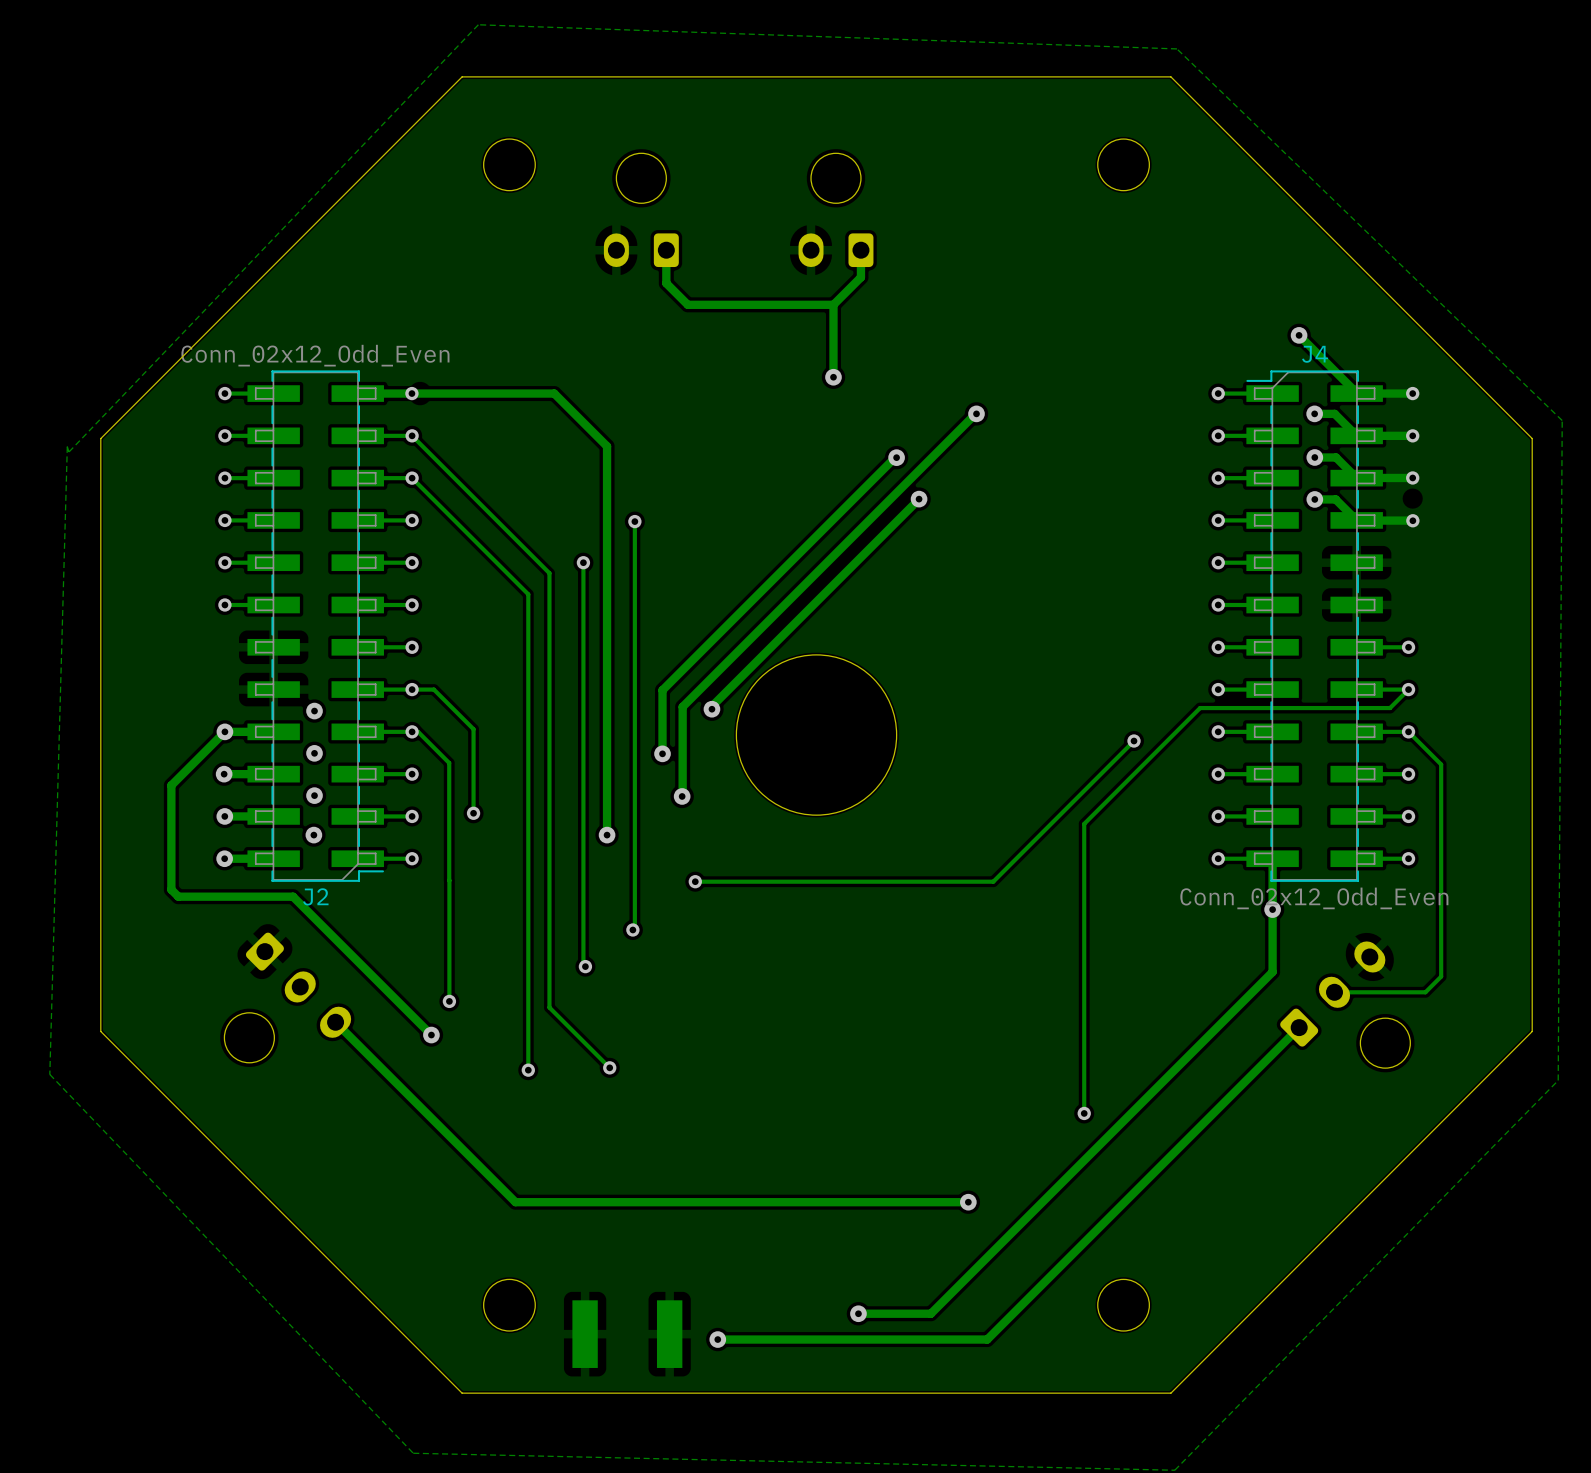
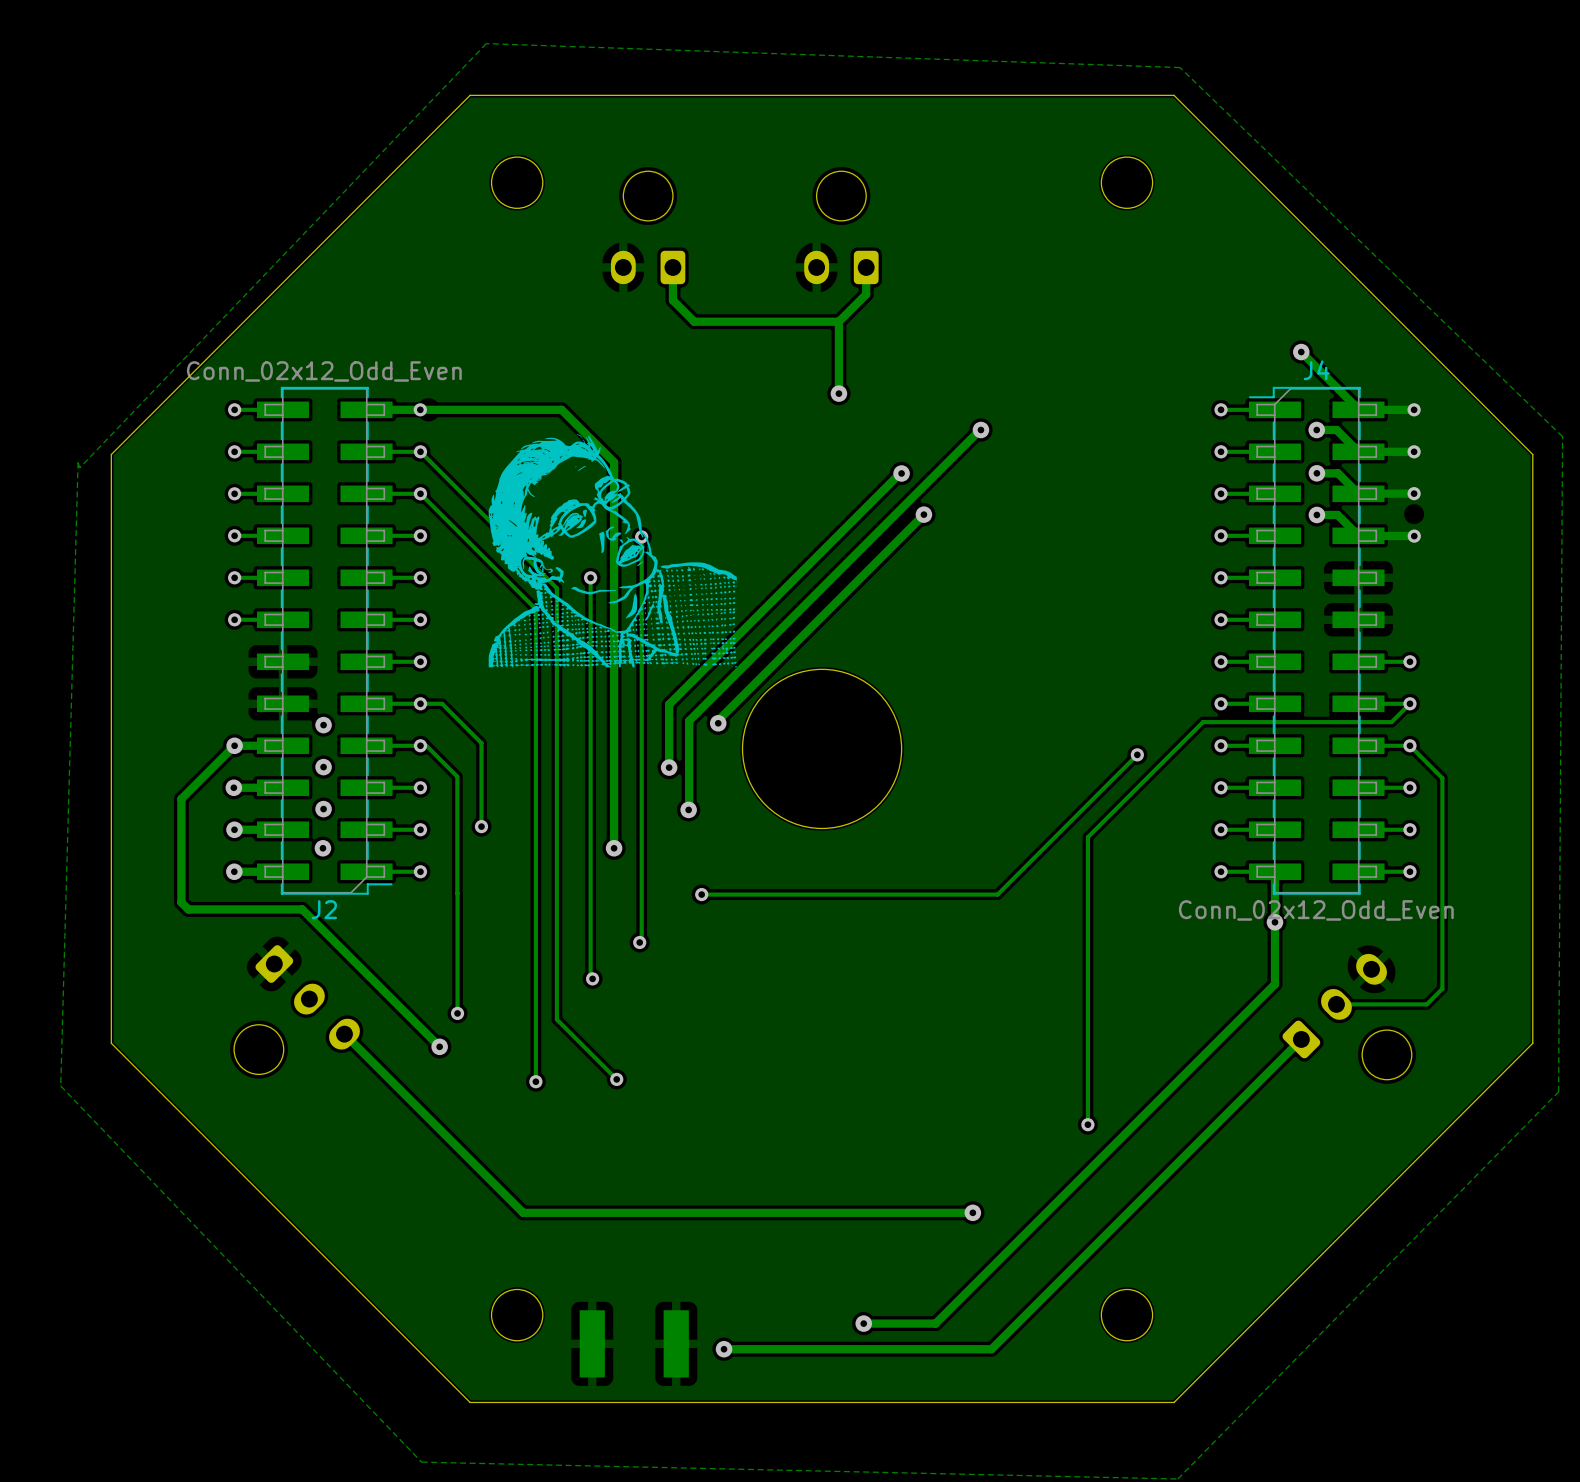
drawing: none -> [488, 434, 737, 668]

